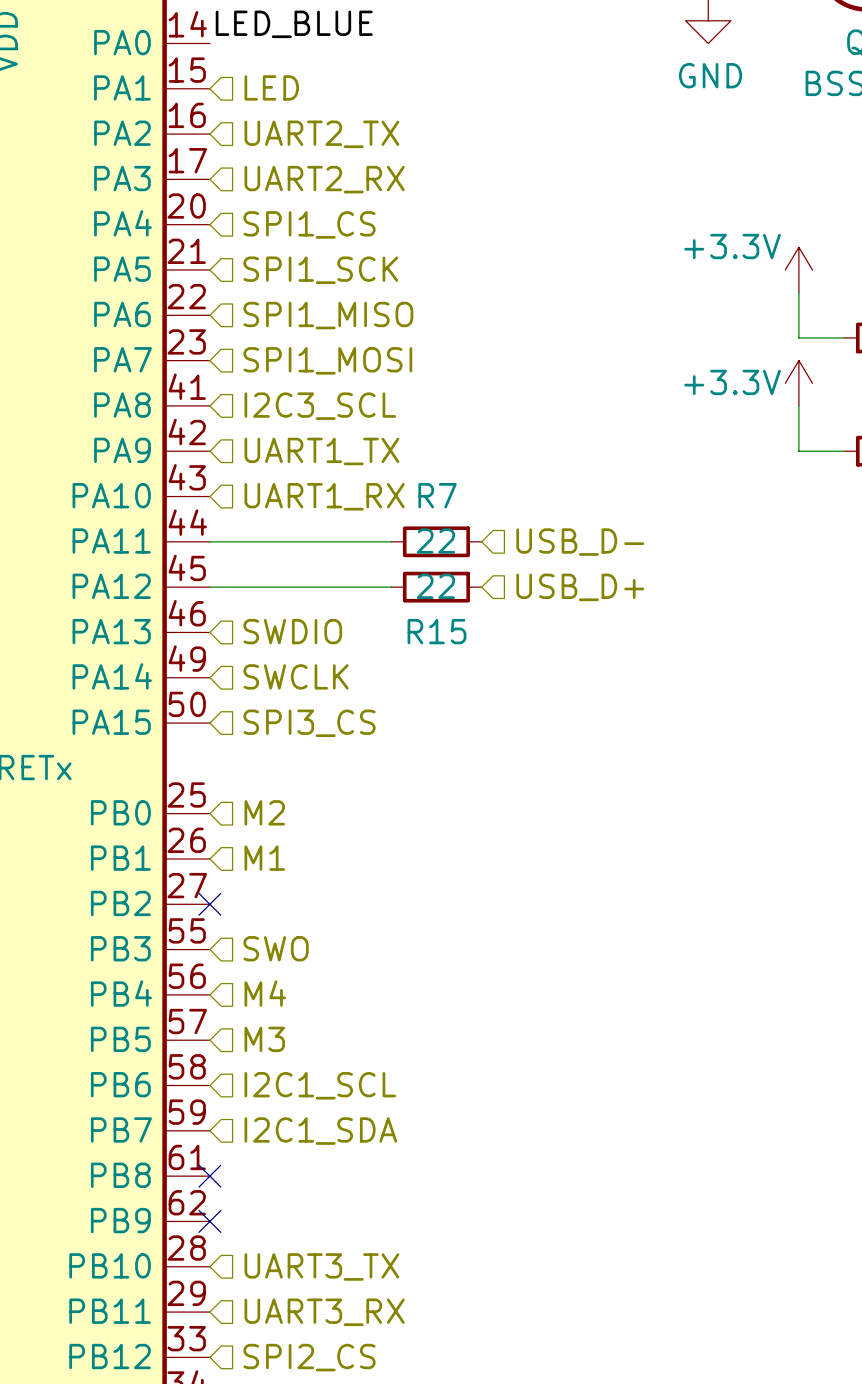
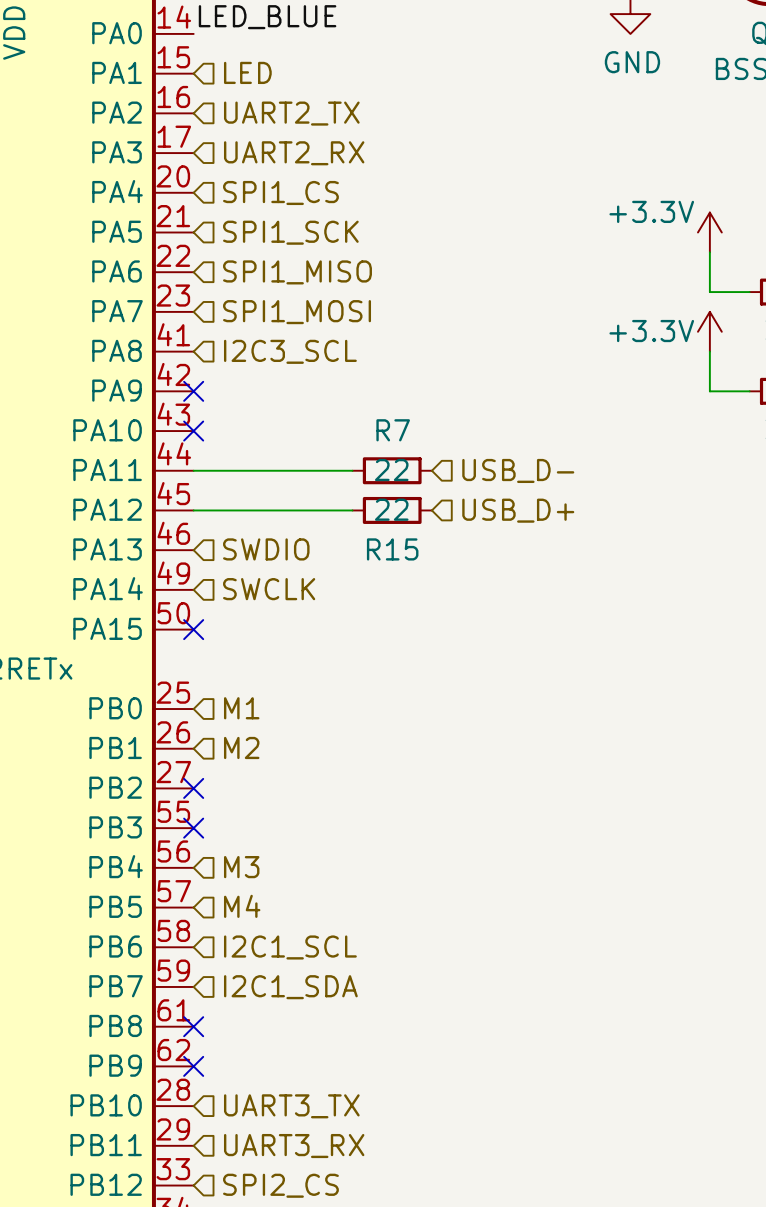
no-connect mark: none -> (193, 391)
hierarchical label: UART1_TX (321, 451) -> none
no-connect mark: none -> (193, 431)
hierarchical label: UART1_RX (324, 496) -> none
no-connect mark: none -> (193, 629)
hierarchical label: SPI3_CS (309, 723) -> none
hierarchical label: M2 (264, 812) -> M1 (241, 708)
hierarchical label: M1 (264, 858) -> M2 (241, 747)
hierarchical label: SWO (276, 948) -> none
no-connect mark: none -> (193, 828)
hierarchical label: M4 (265, 993) -> M3 (241, 867)
hierarchical label: M3 (264, 1039) -> M4 (242, 906)

